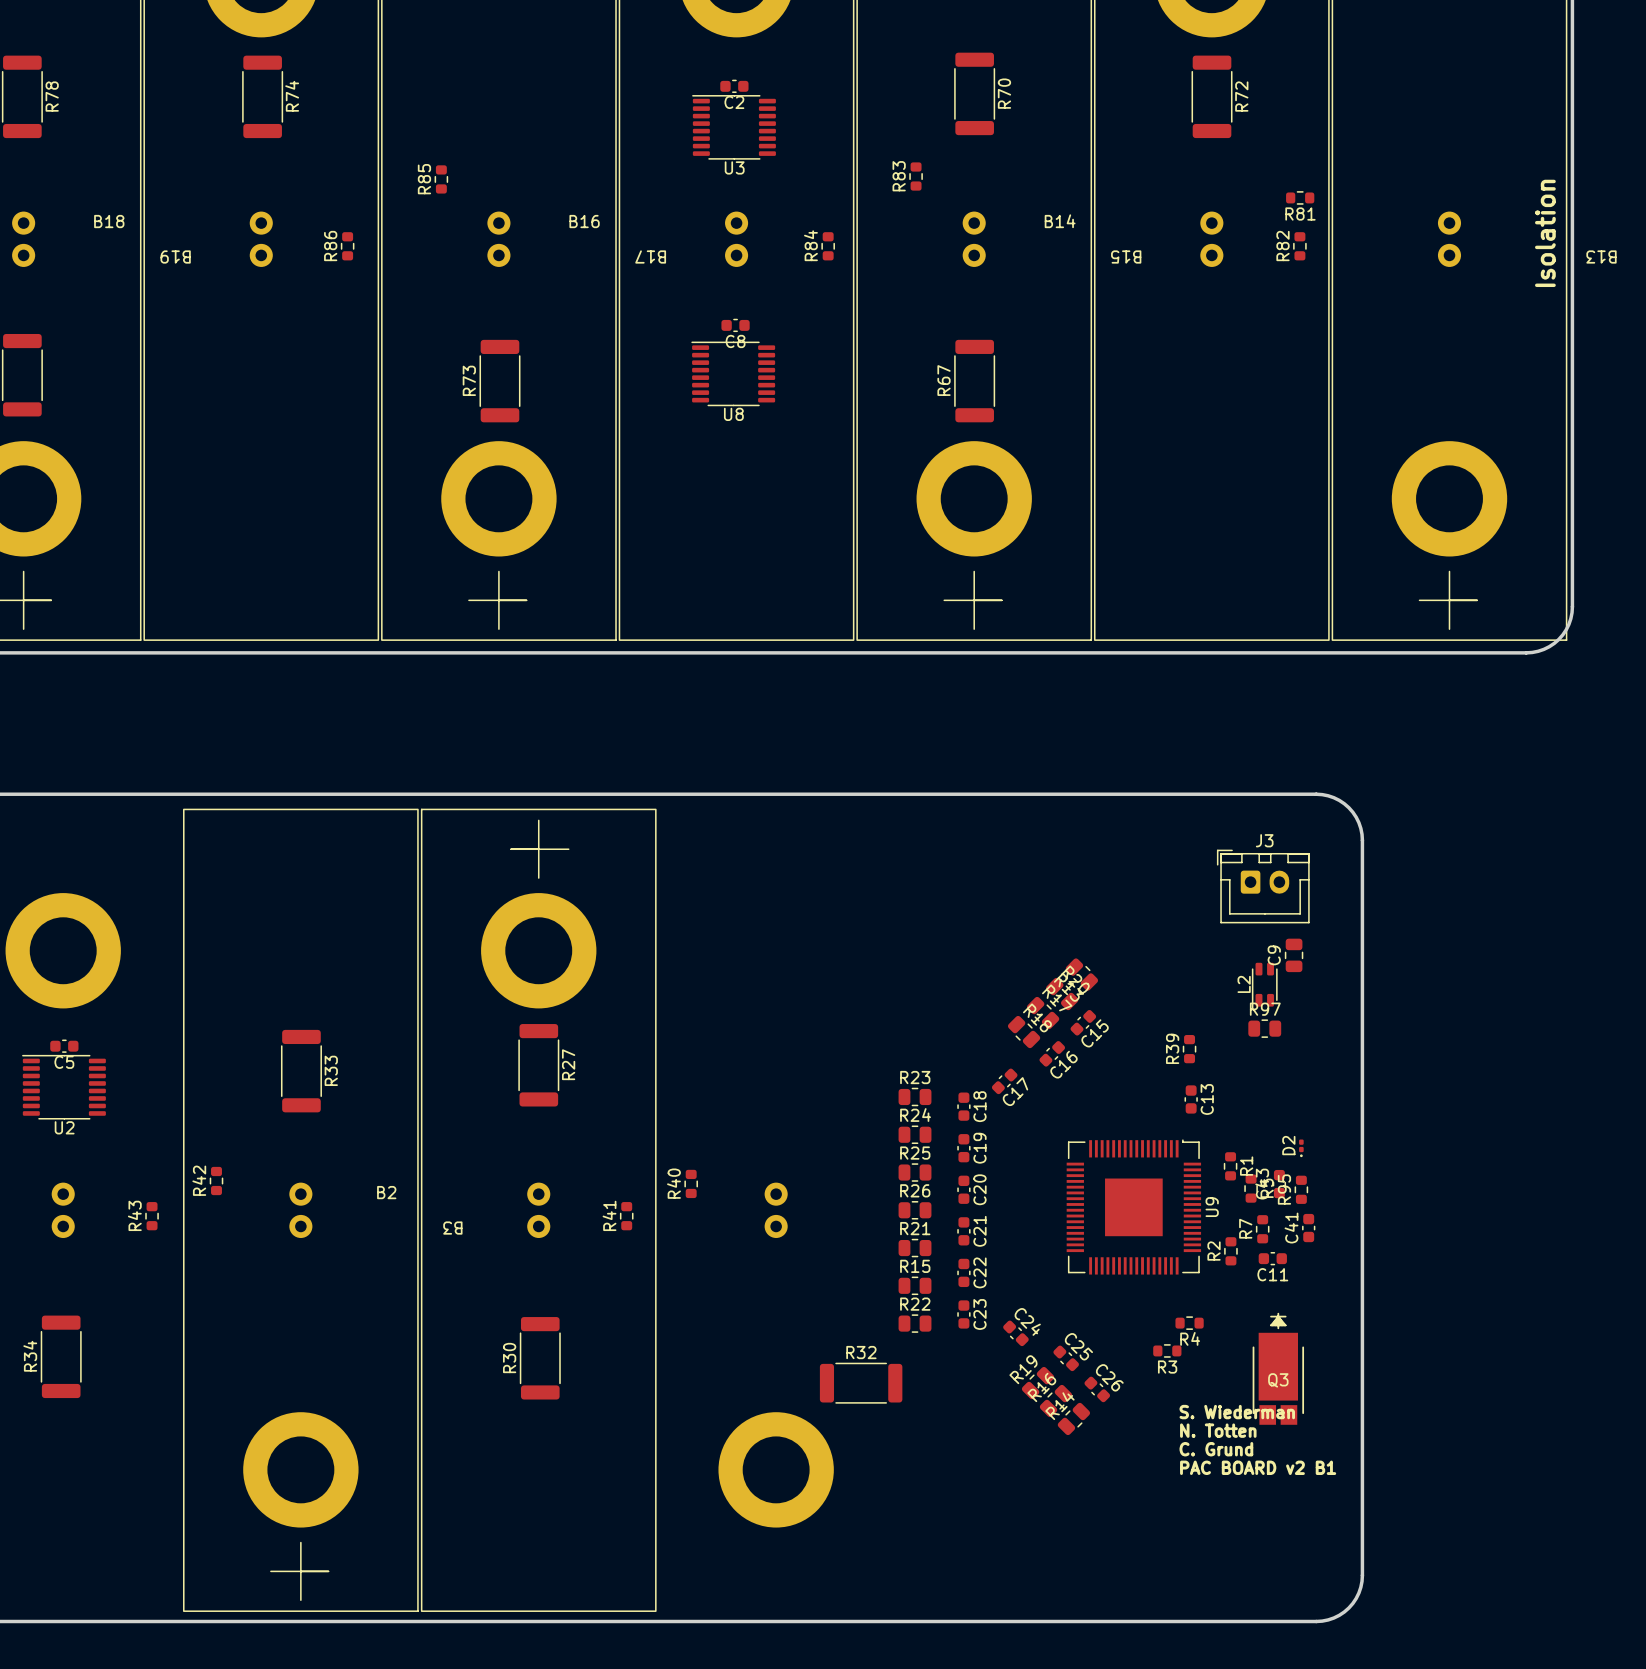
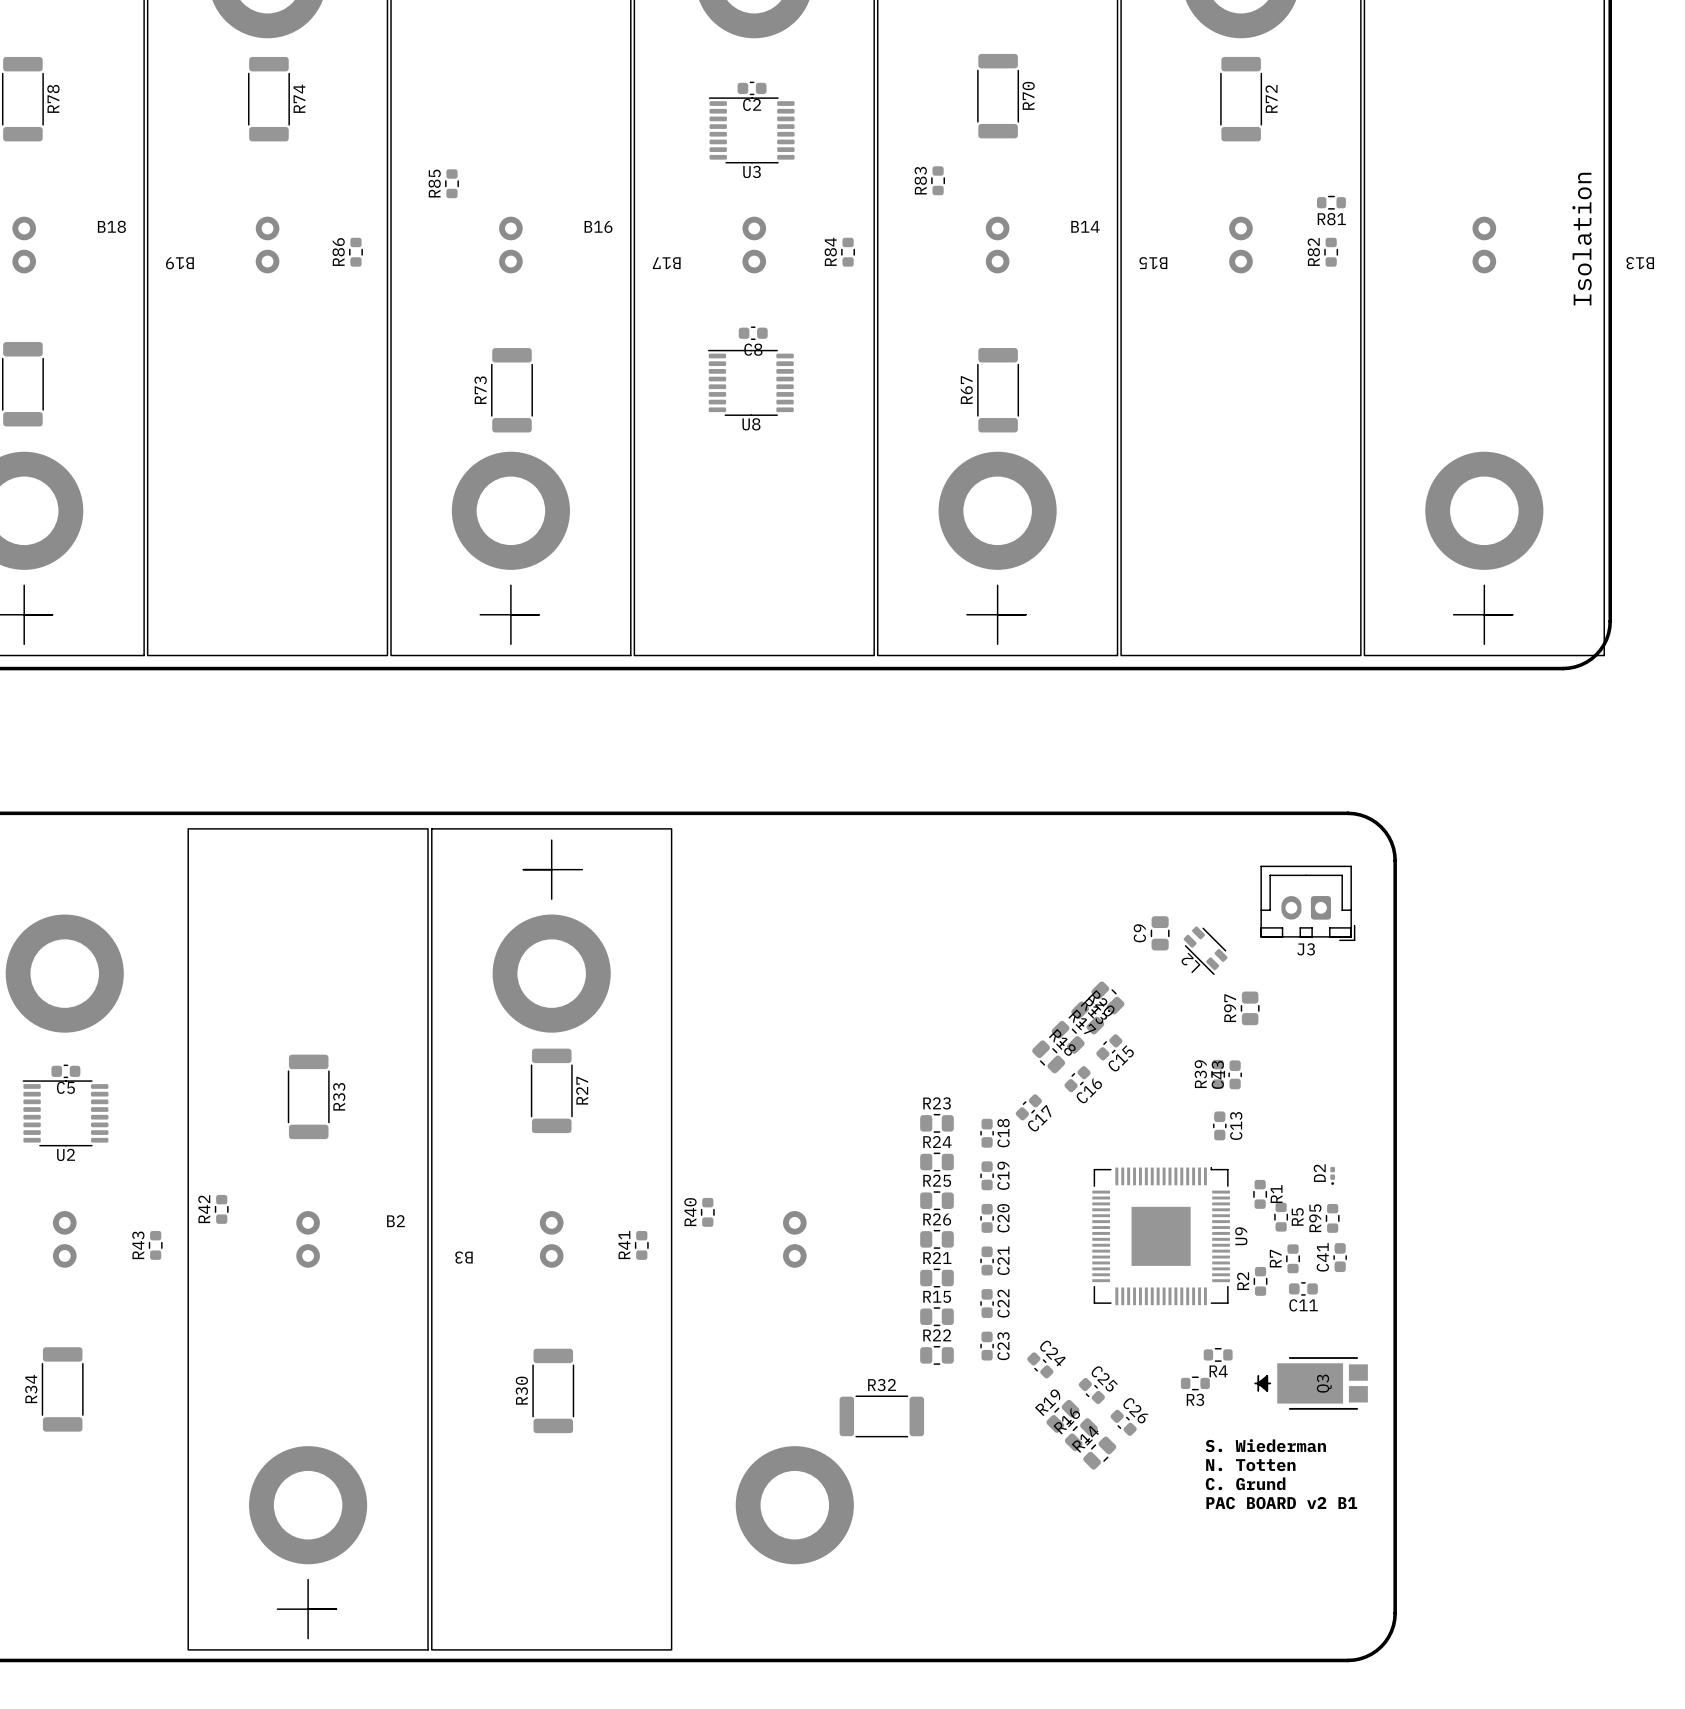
J3 rotation: 0° (1263, 886) -> 180° (1307, 903)
C9 position: (1294, 955) -> (1160, 933)
L2 rotation: 0° (1264, 985) -> 45° counterclockwise (1205, 950)
L2 position: (1264, 985) -> (1205, 950)
R97 name position: R97 (1265, 1009) -> R97 (1230, 1008)
R97 rotation: 0° (1264, 1028) -> 90° clockwise (1250, 1008)
R97 position: (1264, 1028) -> (1250, 1008)
C43 position: (1279, 1184) -> (1235, 1074)
Q3 footprint: [1252, 1312, 1305, 1425] -> [1254, 1357, 1368, 1410]

